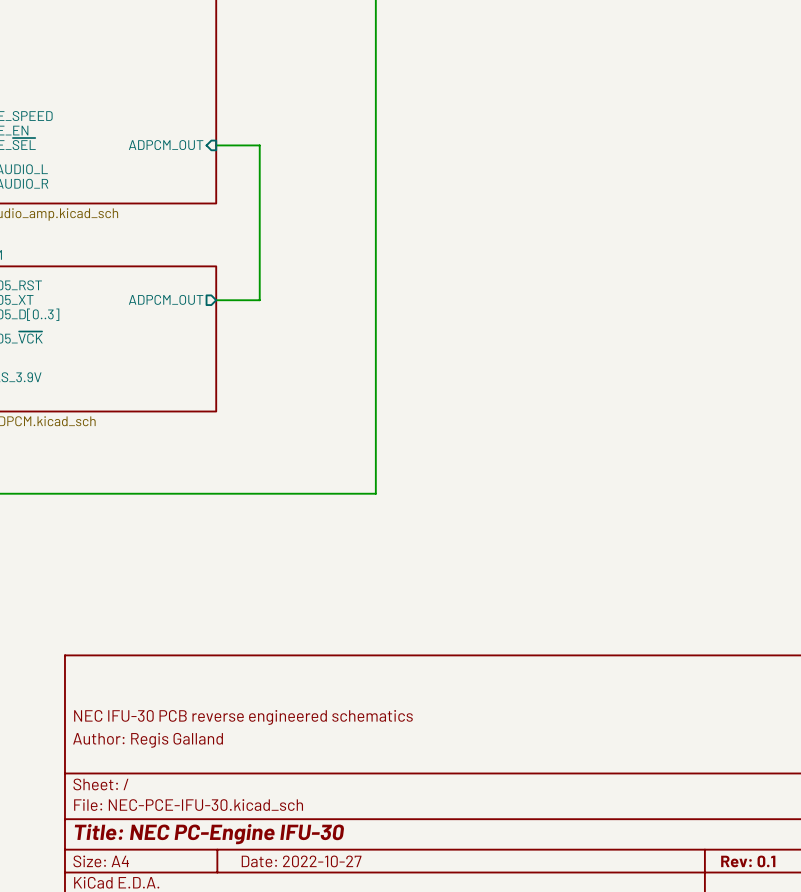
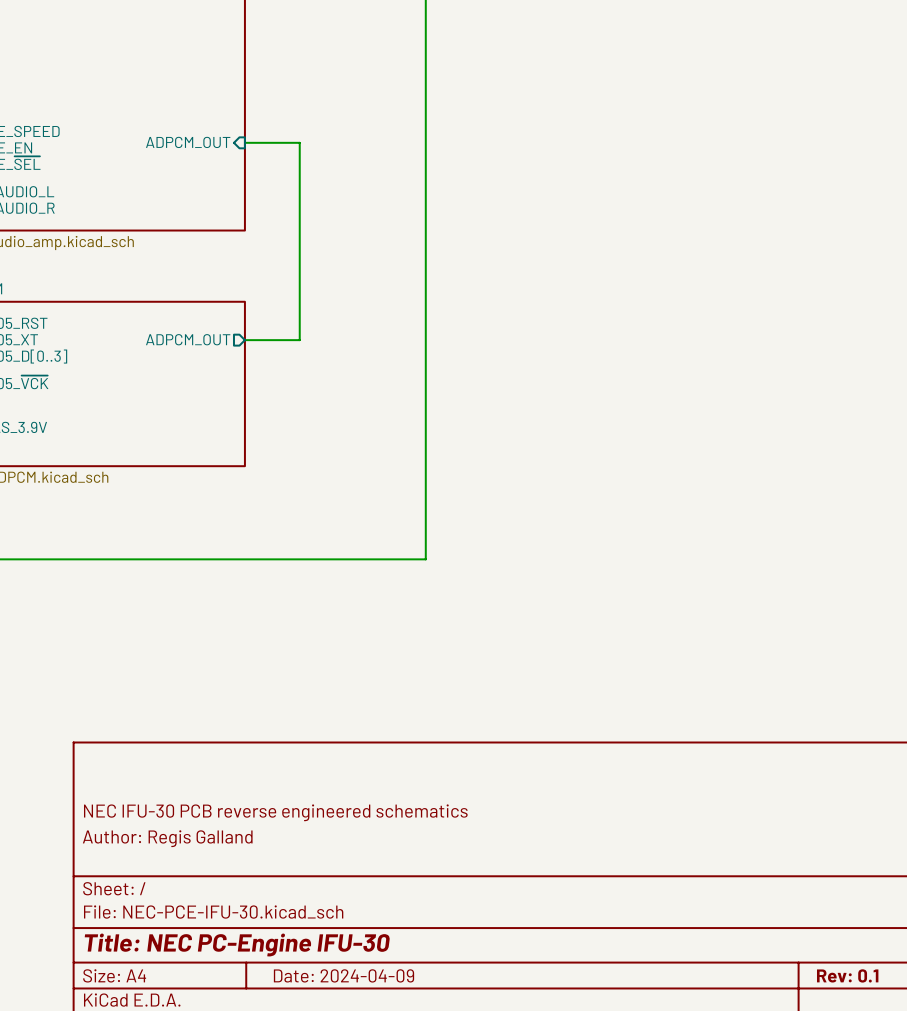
sheet pin position: ADPCM_OUT (166, 145) -> ADPCM_OUT (188, 142)
wire: (216, 145) (259, 145) (259, 300) -> (244, 142) (299, 142) (299, 340) (294, 340)
title block: Date: 2022-10-27 (301, 861) -> Date: 2024-04-09 (343, 975)

